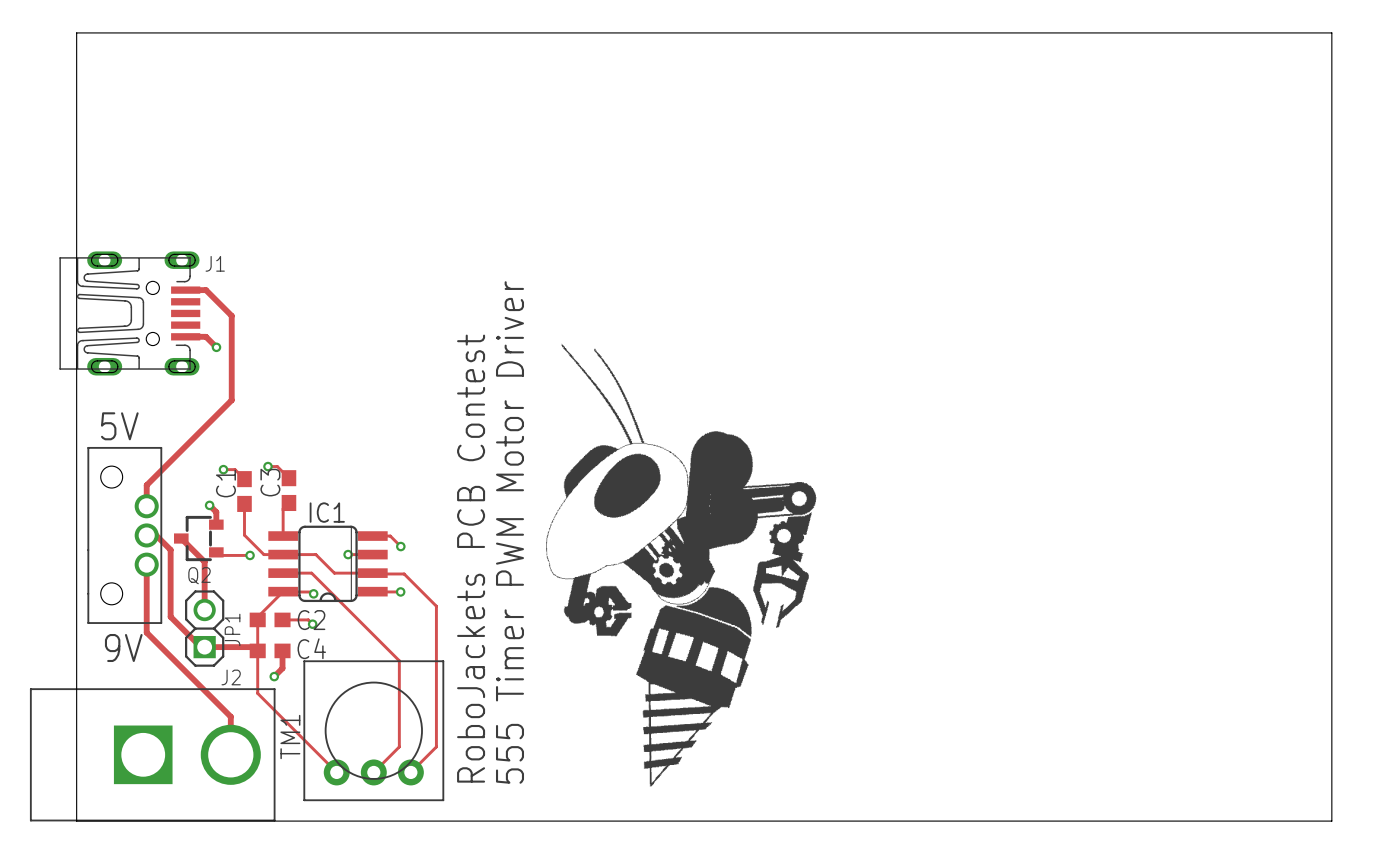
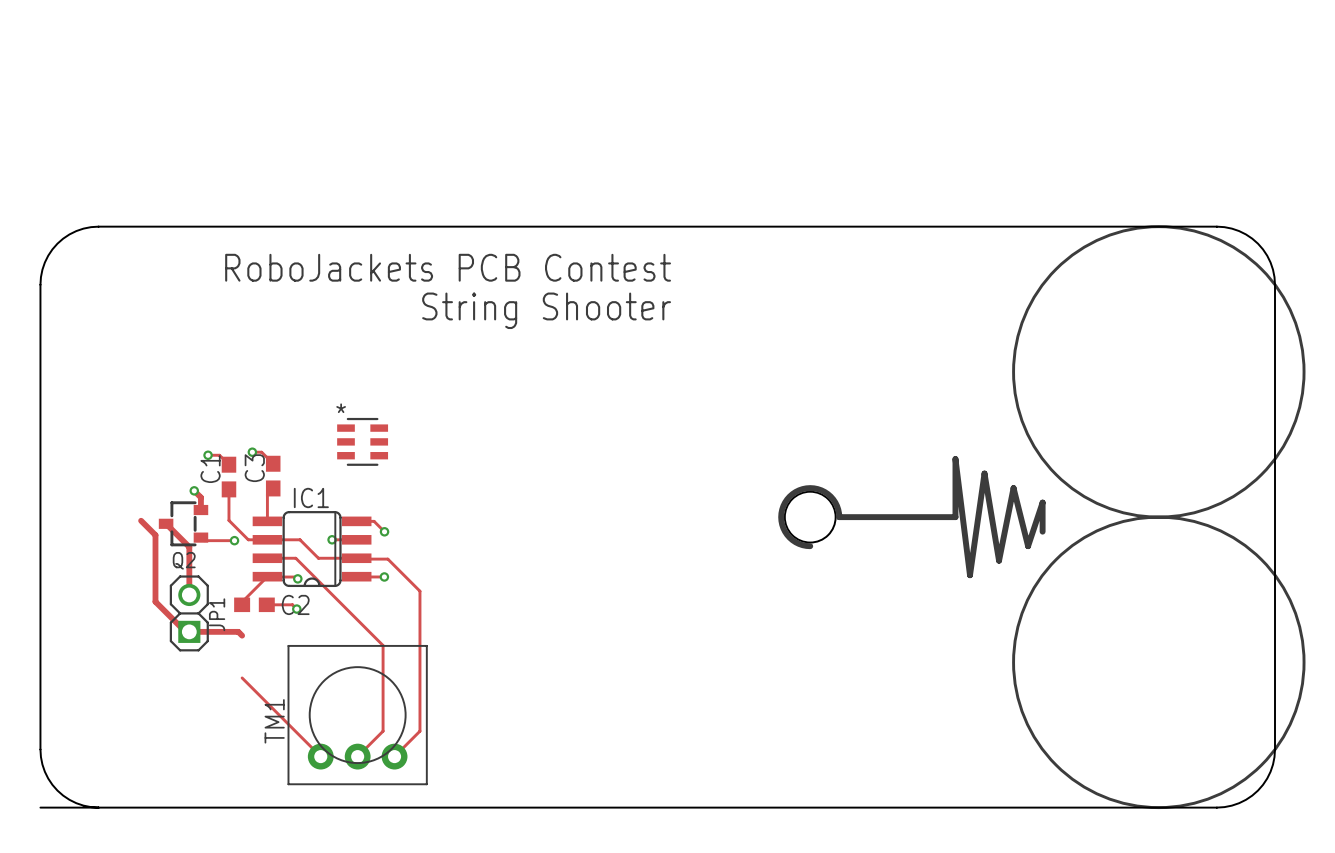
board edge: (76, 32) (1331, 32) (1331, 821) (76, 821) (76, 32) -> none
drawing: none -> [1012, 225, 1306, 810]
text: none -> RoboJackets PCB Contest (448, 267)
track: (185, 290) (205, 290) (231, 315) (231, 400) (146, 485) (146, 506) -> none
J1: (129, 313) -> none
text: none -> String Shooter (546, 310)
track: (185, 336) (205, 336) (216, 347) -> none
drawing: [546, 343, 817, 787] -> none
via: (216, 347) -> none
text: 5V (119, 426) -> none
part: none -> (362, 441)
part: none -> (911, 517)
text: 555 Timer PWM Motor Driver (510, 532) -> none
part: (124, 535) -> none
text: RoboJackets PCB Contest (471, 558) -> none
track: (146, 564) (146, 632) (230, 716) (230, 754) -> none
track: (257, 619) (257, 693) -> none
text: 9V (123, 648) -> none
C4: (270, 650) -> none
track: (282, 650) (282, 668) (274, 676) -> none
via: (274, 676) -> none
J2: (152, 754) -> none
board edge: none -> (40, 807) (1216, 807) (1239, 803) (1252, 795) (1267, 778) (1273, 764) (1275, 749) (1275, 284) (1270, 262) (1262, 249) (1245, 234) (1231, 228) (1216, 226) (98, 226) (76, 231) (63, 238) (52, 249) (44, 262) (40, 277) (40, 749) (44, 771) (57, 790) (76, 803) (90, 807) (98, 807)

